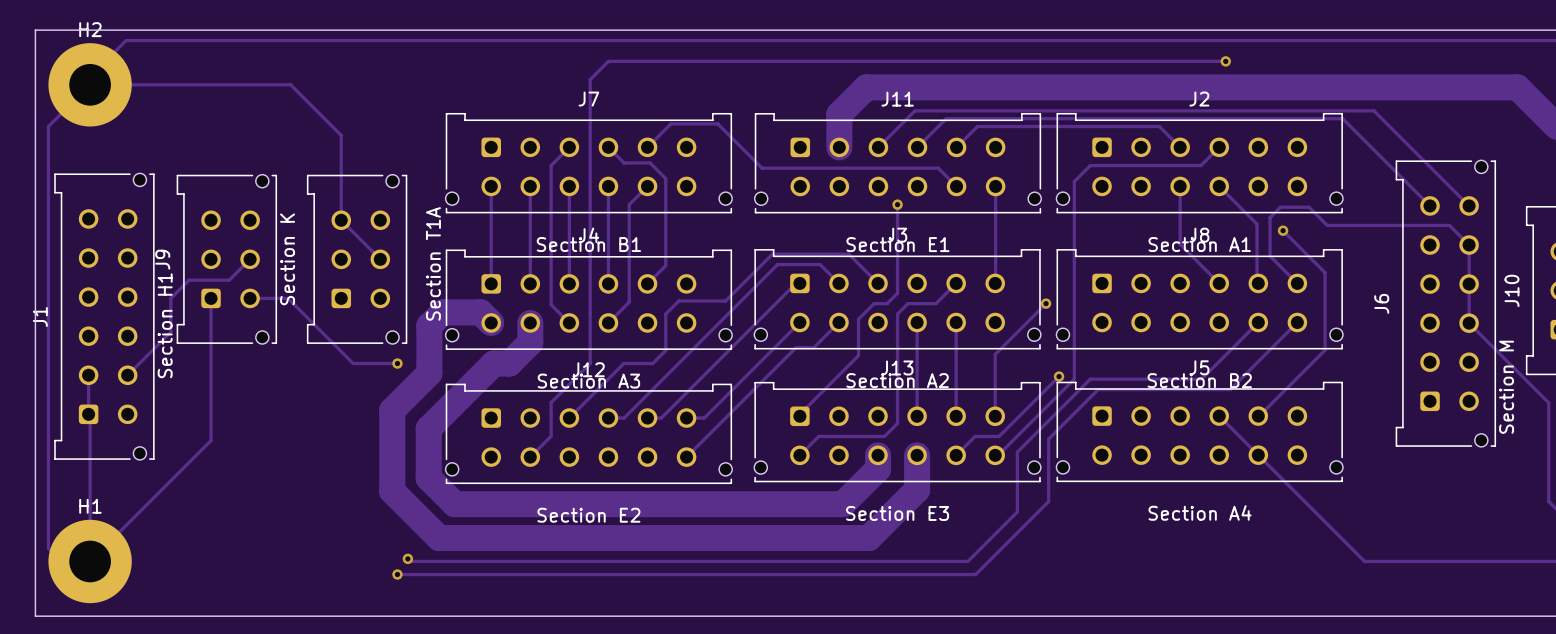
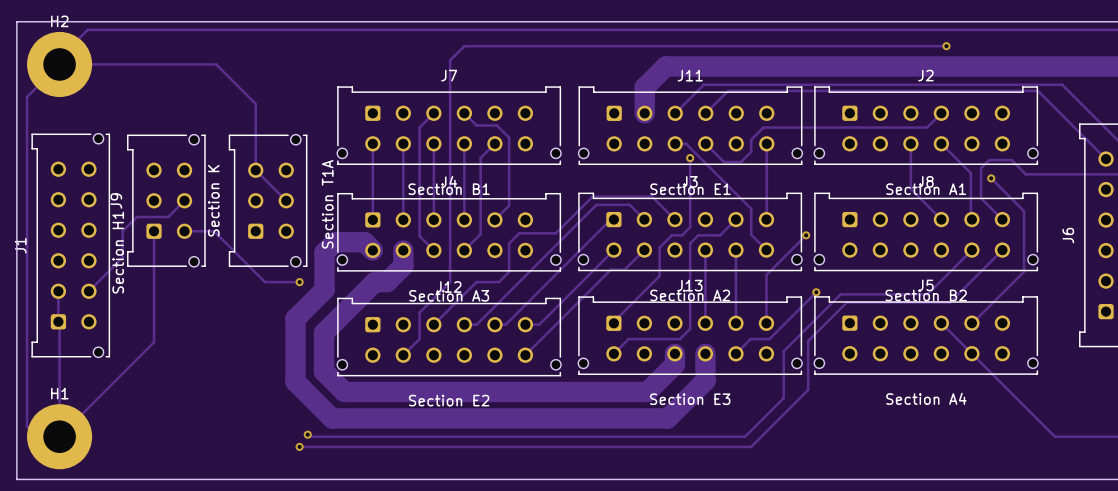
track: (647, 147) (670, 123) (717, 123) (762, 168) (938, 168) (956, 186) -> none
track: (1180, 147) (1159, 126) (977, 126) (956, 147) -> none
track: (1090, 165) (1074, 181) (1074, 379) (998, 455) -> (840, 127) (763, 127) (751, 139) (751, 151) (741, 162) (724, 162) (705, 143)
track: none -> (675, 143) (686, 143) (751, 208) (751, 234) (766, 250)

